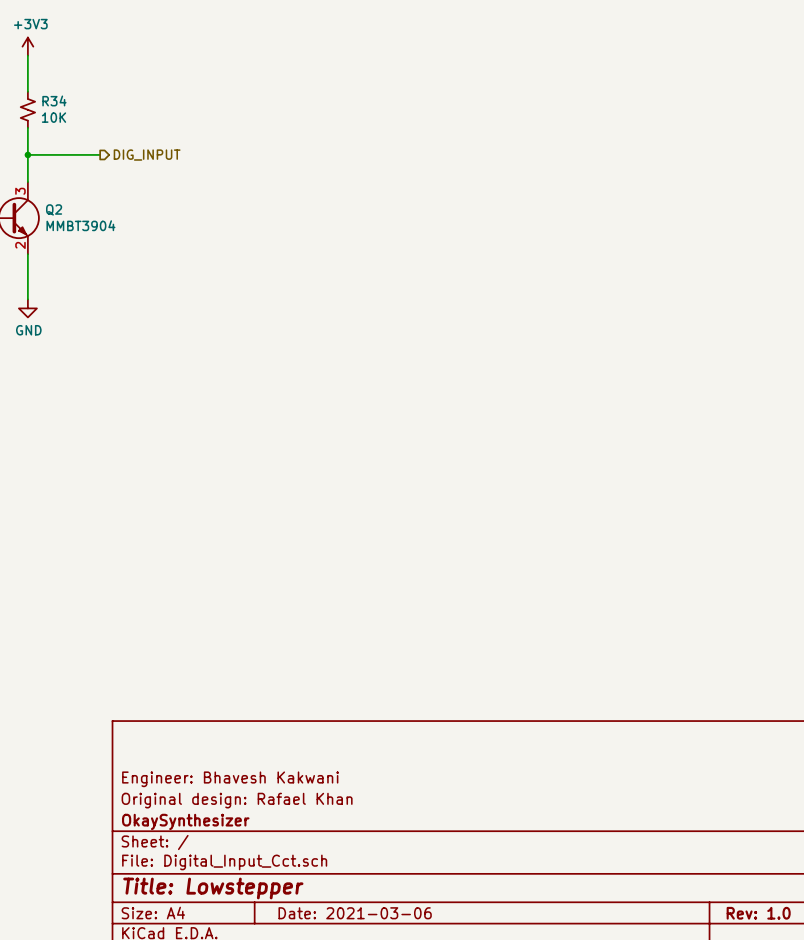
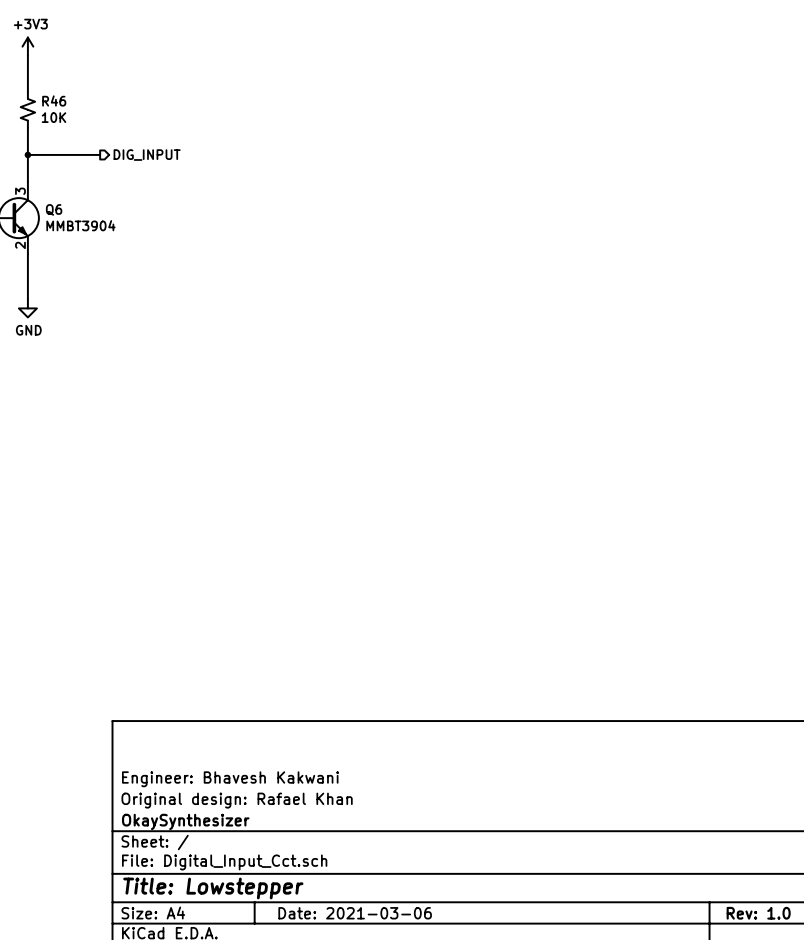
R34 name: R34 (54, 100) -> R46 (54, 100)
Q2 name: Q2 (54, 209) -> Q6 (54, 209)

